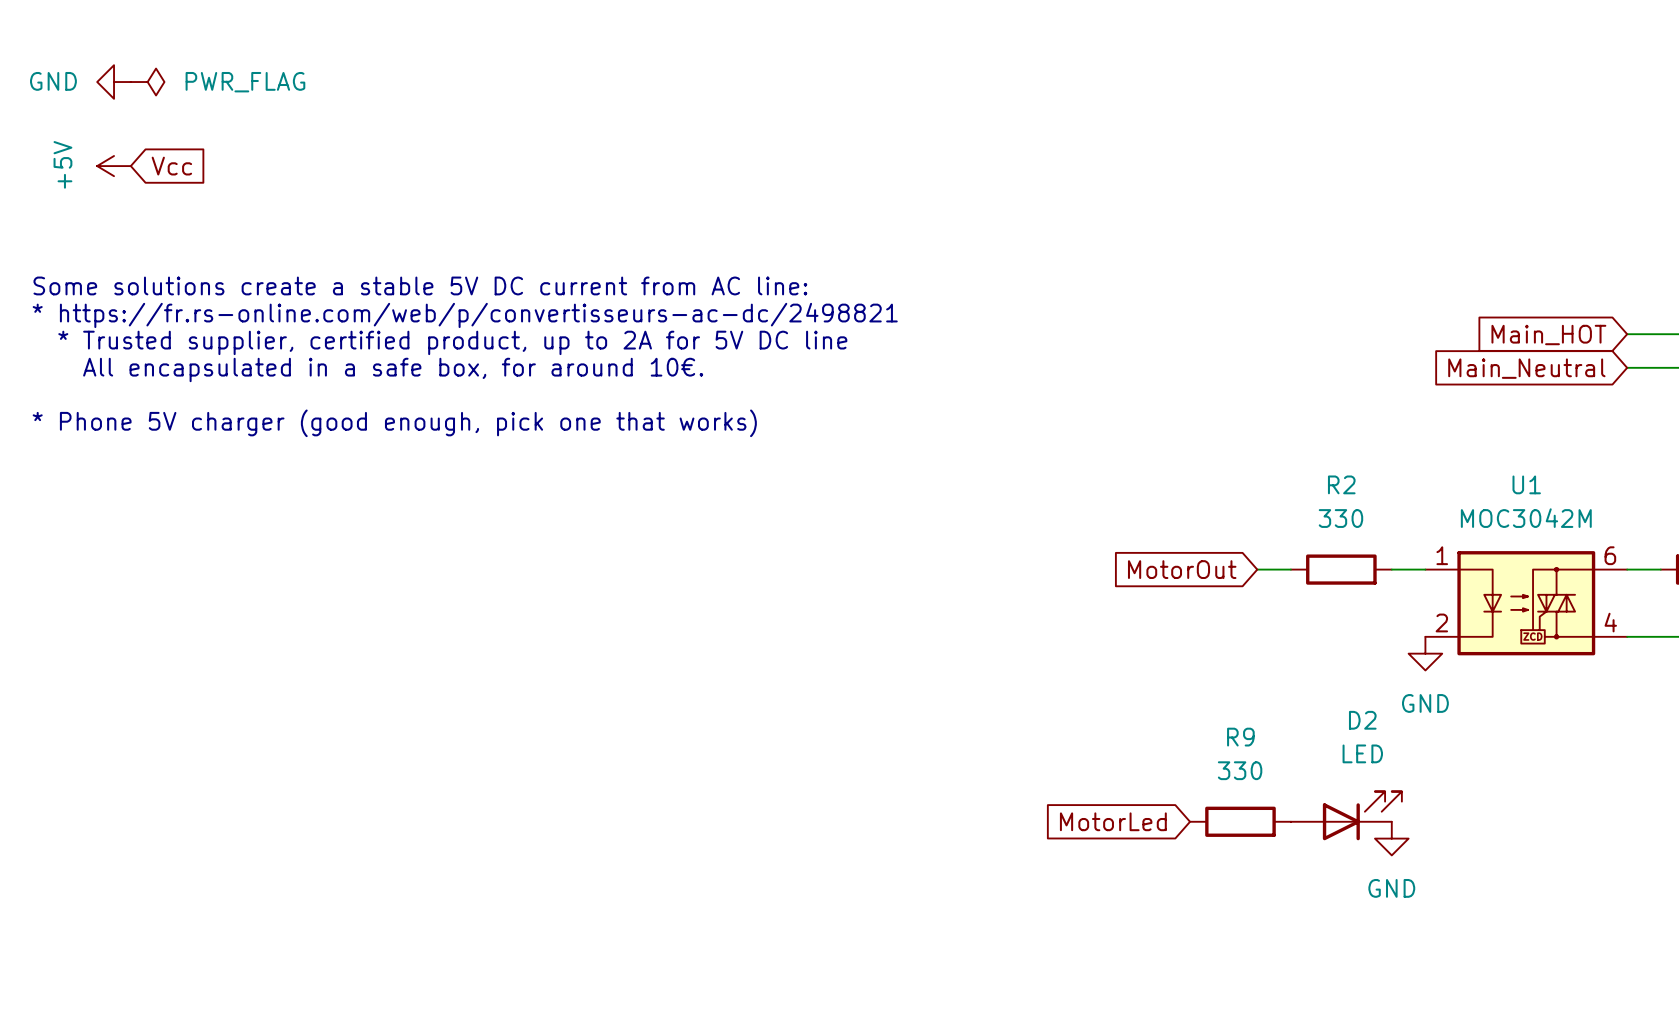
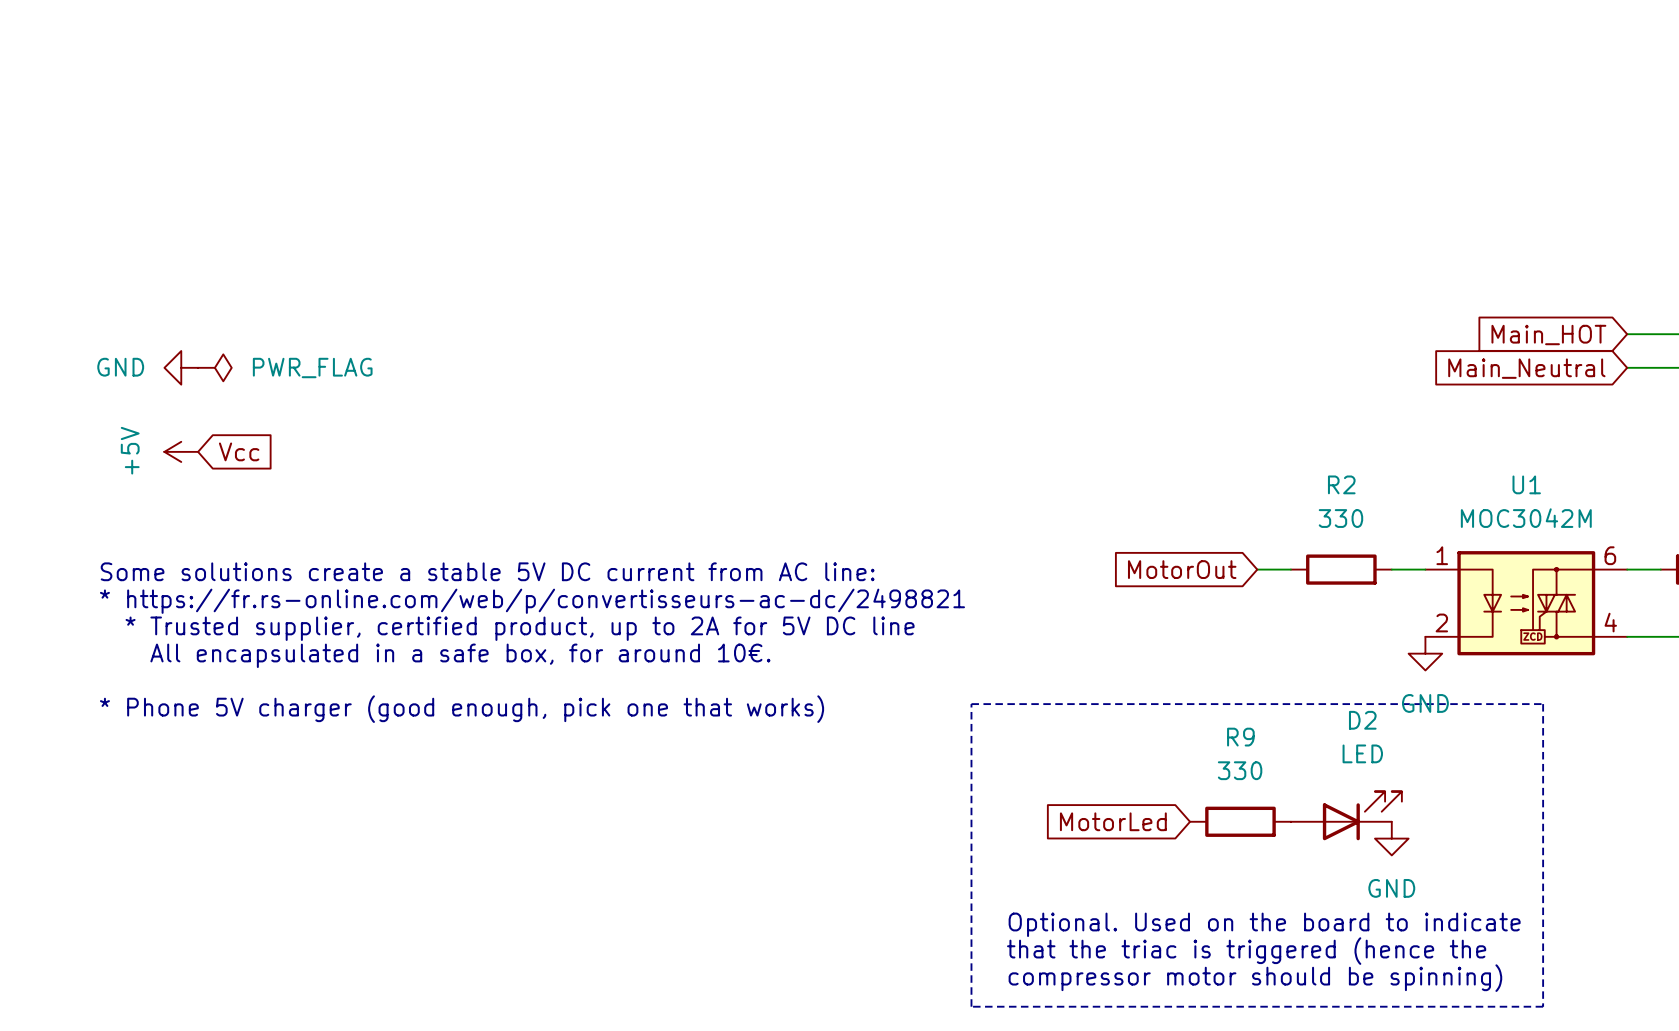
power symbol position: GND (114, 82) -> GND (181, 367)
power symbol position: PWR_FLAG (147, 82) -> PWR_FLAG (214, 367)
power symbol position: +5V (114, 166) -> +5V (181, 451)
global label position: Vcc (171, 166) -> Vcc (239, 451)
text position: Some solutions create a stable 5V DC current from AC line: (420, 285) -> Some solutions create a stable 5V DC current from AC line: (487, 571)
text position: * https://fr.rs-online.com/web/p/convertisseurs-ac-dc/2498821 (465, 315) -> * https://fr.rs-online.com/web/p/convertisseurs-ac-dc/2498821 (532, 601)
text position: * Trusted supplier, certified product, up to 2A for 5V DC line (452, 342) -> * Trusted supplier, certified product, up to 2A for 5V DC line (520, 628)
text position: All encapsulated in a safe box, for around 10€. (393, 369) -> All encapsulated in a safe box, for around 10€. (460, 655)
text position: * Phone 5V charger (good enough, pick one that works) (394, 423) -> * Phone 5V charger (good enough, pick one that works) (462, 709)
line: none -> (971, 704) (1543, 704) (1543, 1006) (971, 1006) (971, 704)
text: none -> Optional. Used on the board to indicate (1264, 924)
text: none -> that the triac is triggered (hence the (1246, 951)
text: none -> compressor motor should be spinning) (1255, 978)

